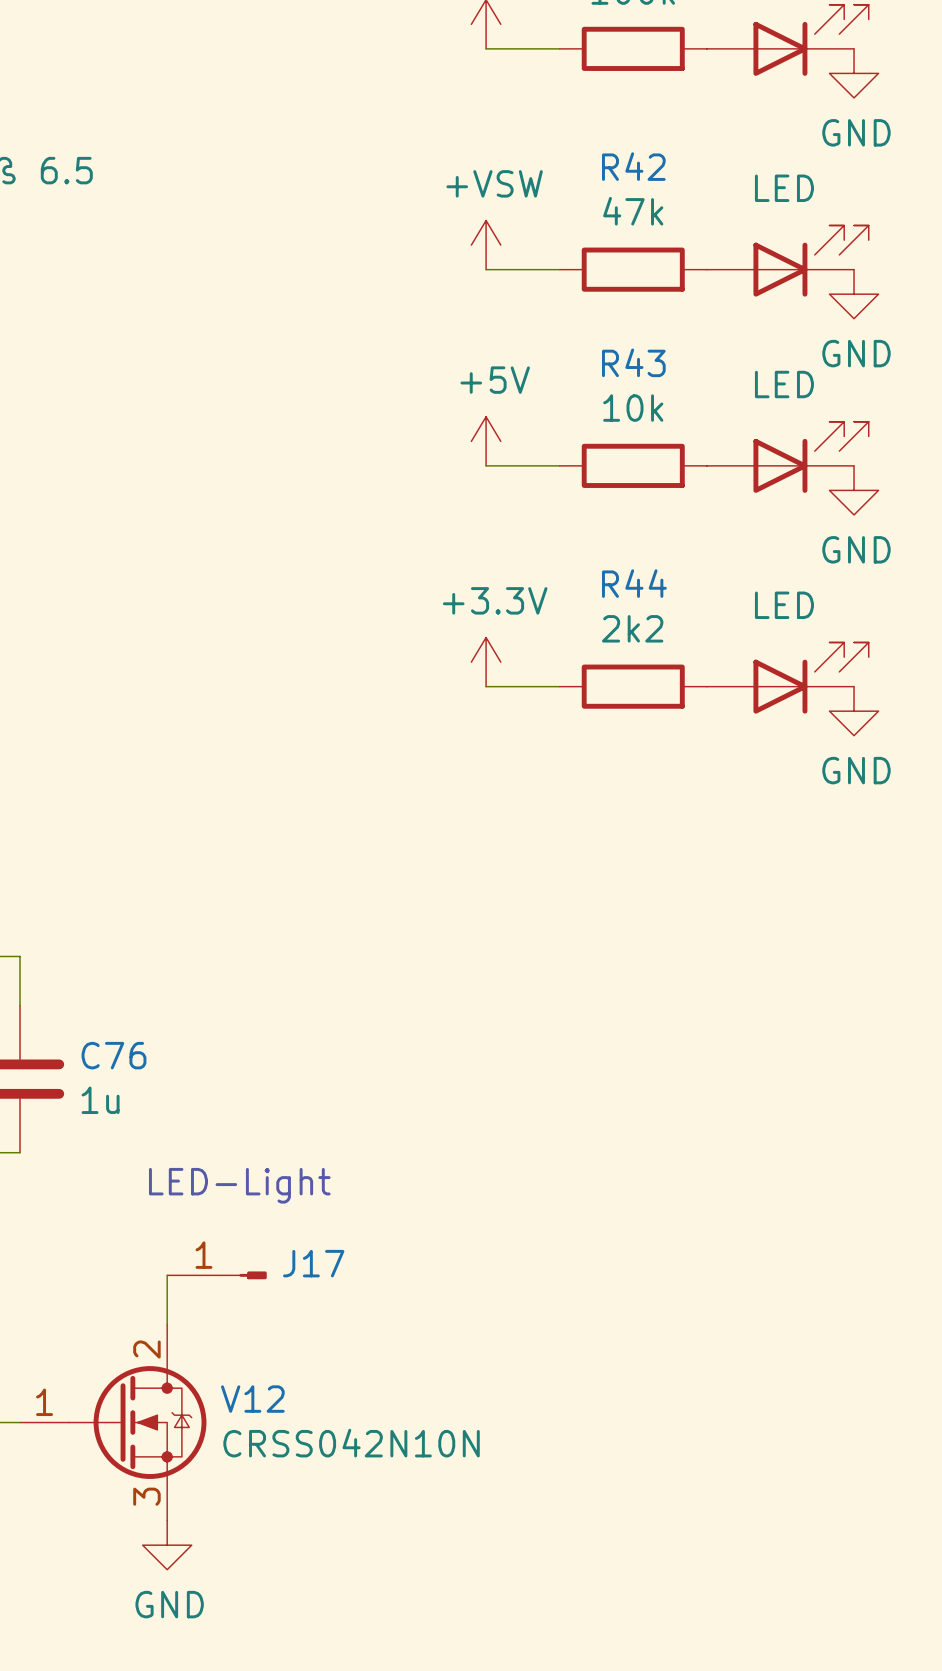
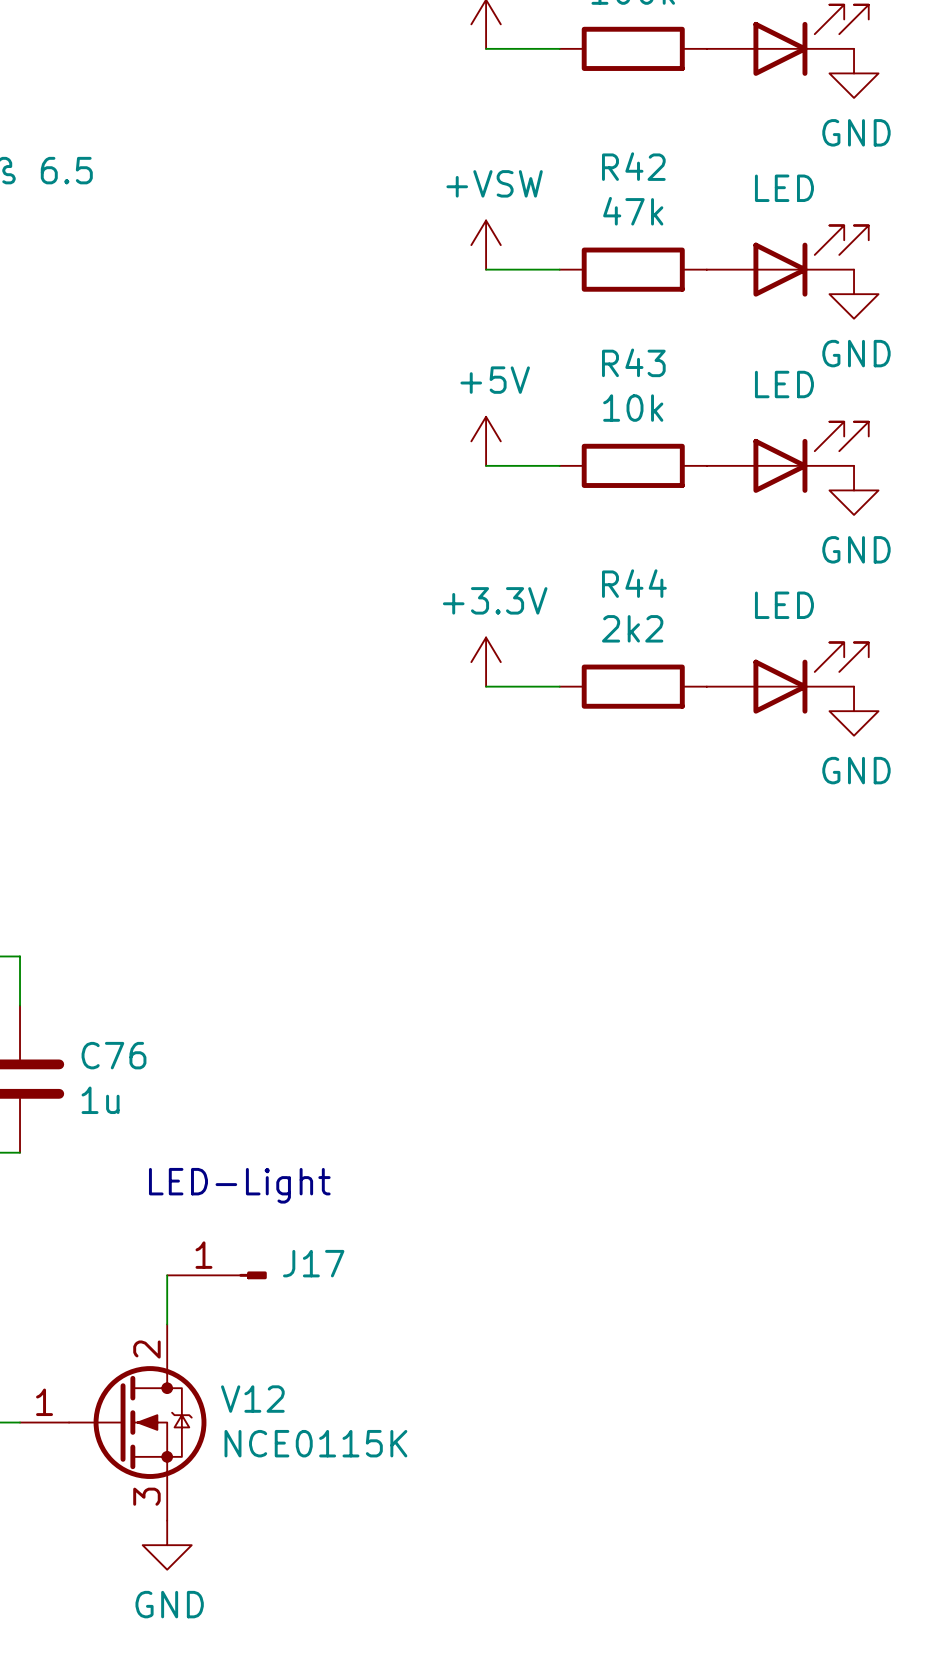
V12 value: CRSS042N10N (351, 1443) -> NCE0115K (315, 1443)

